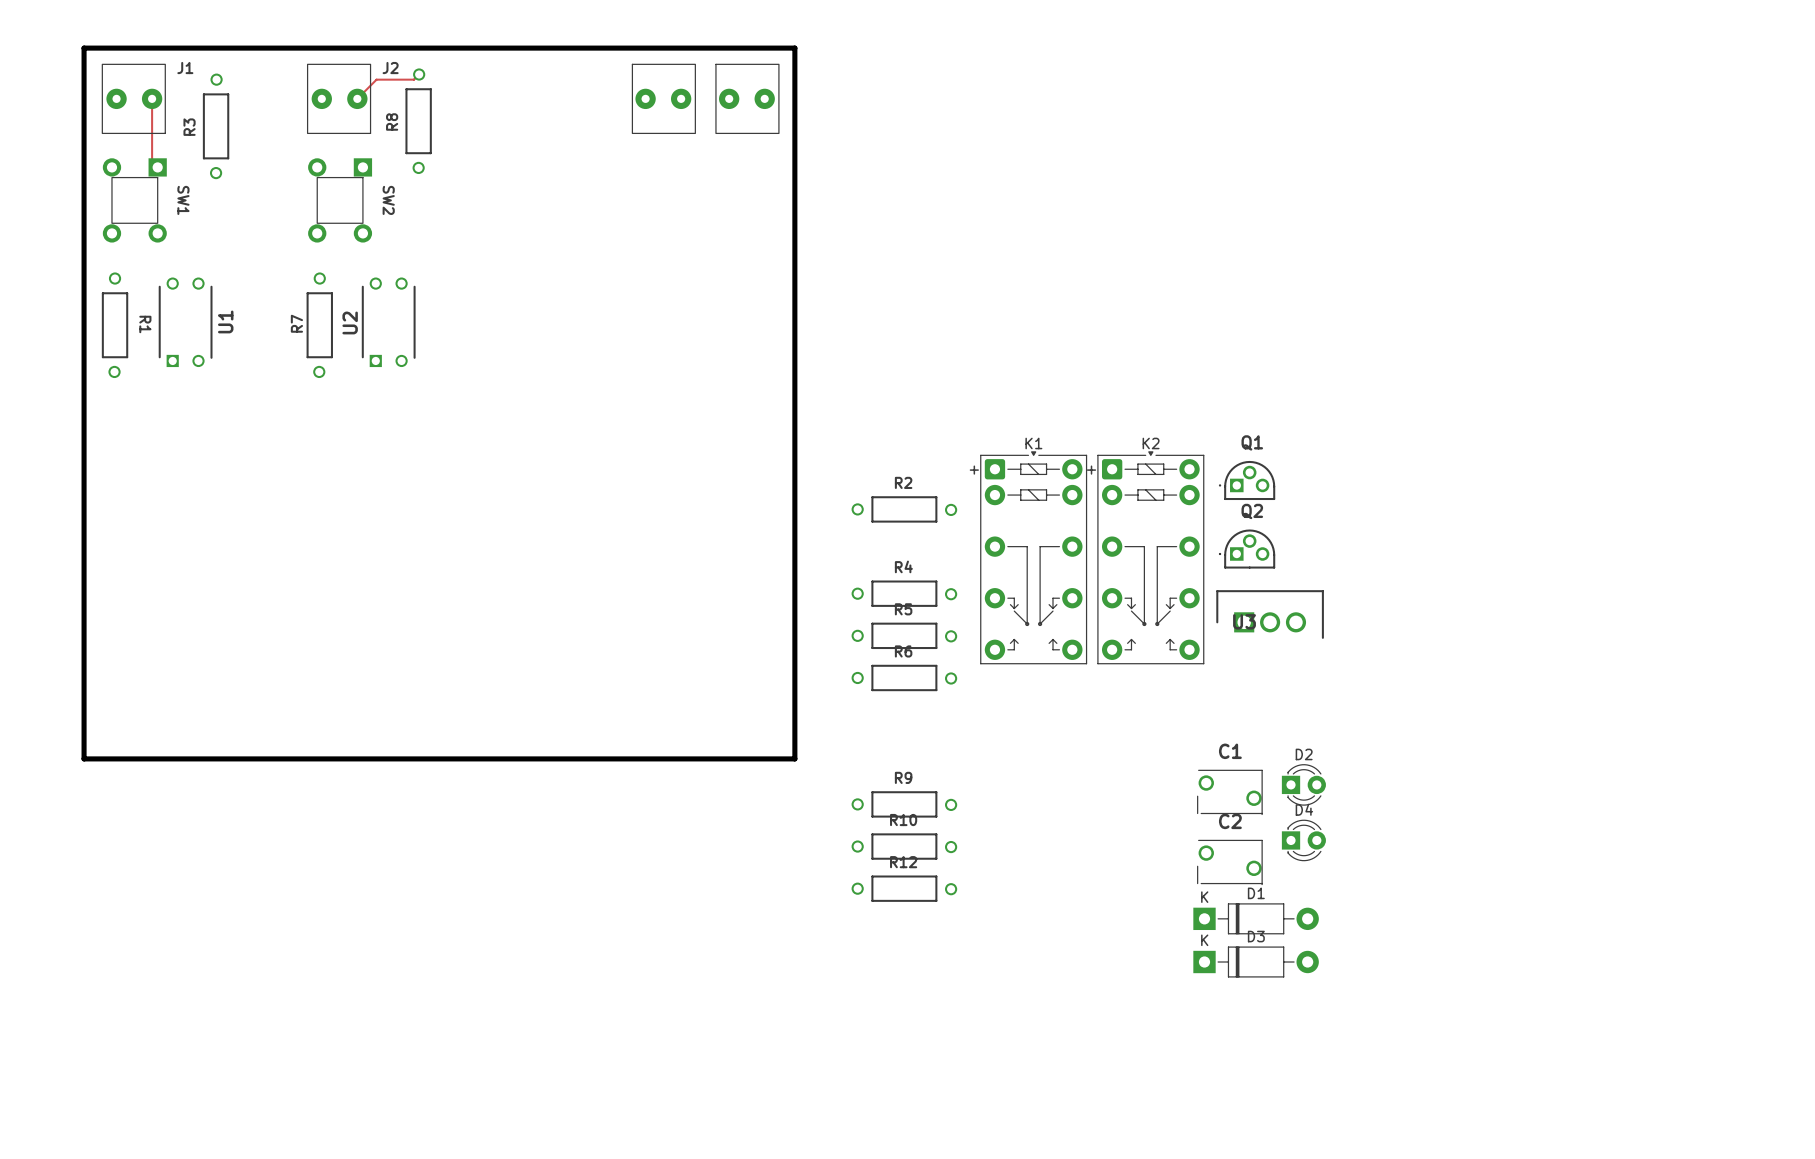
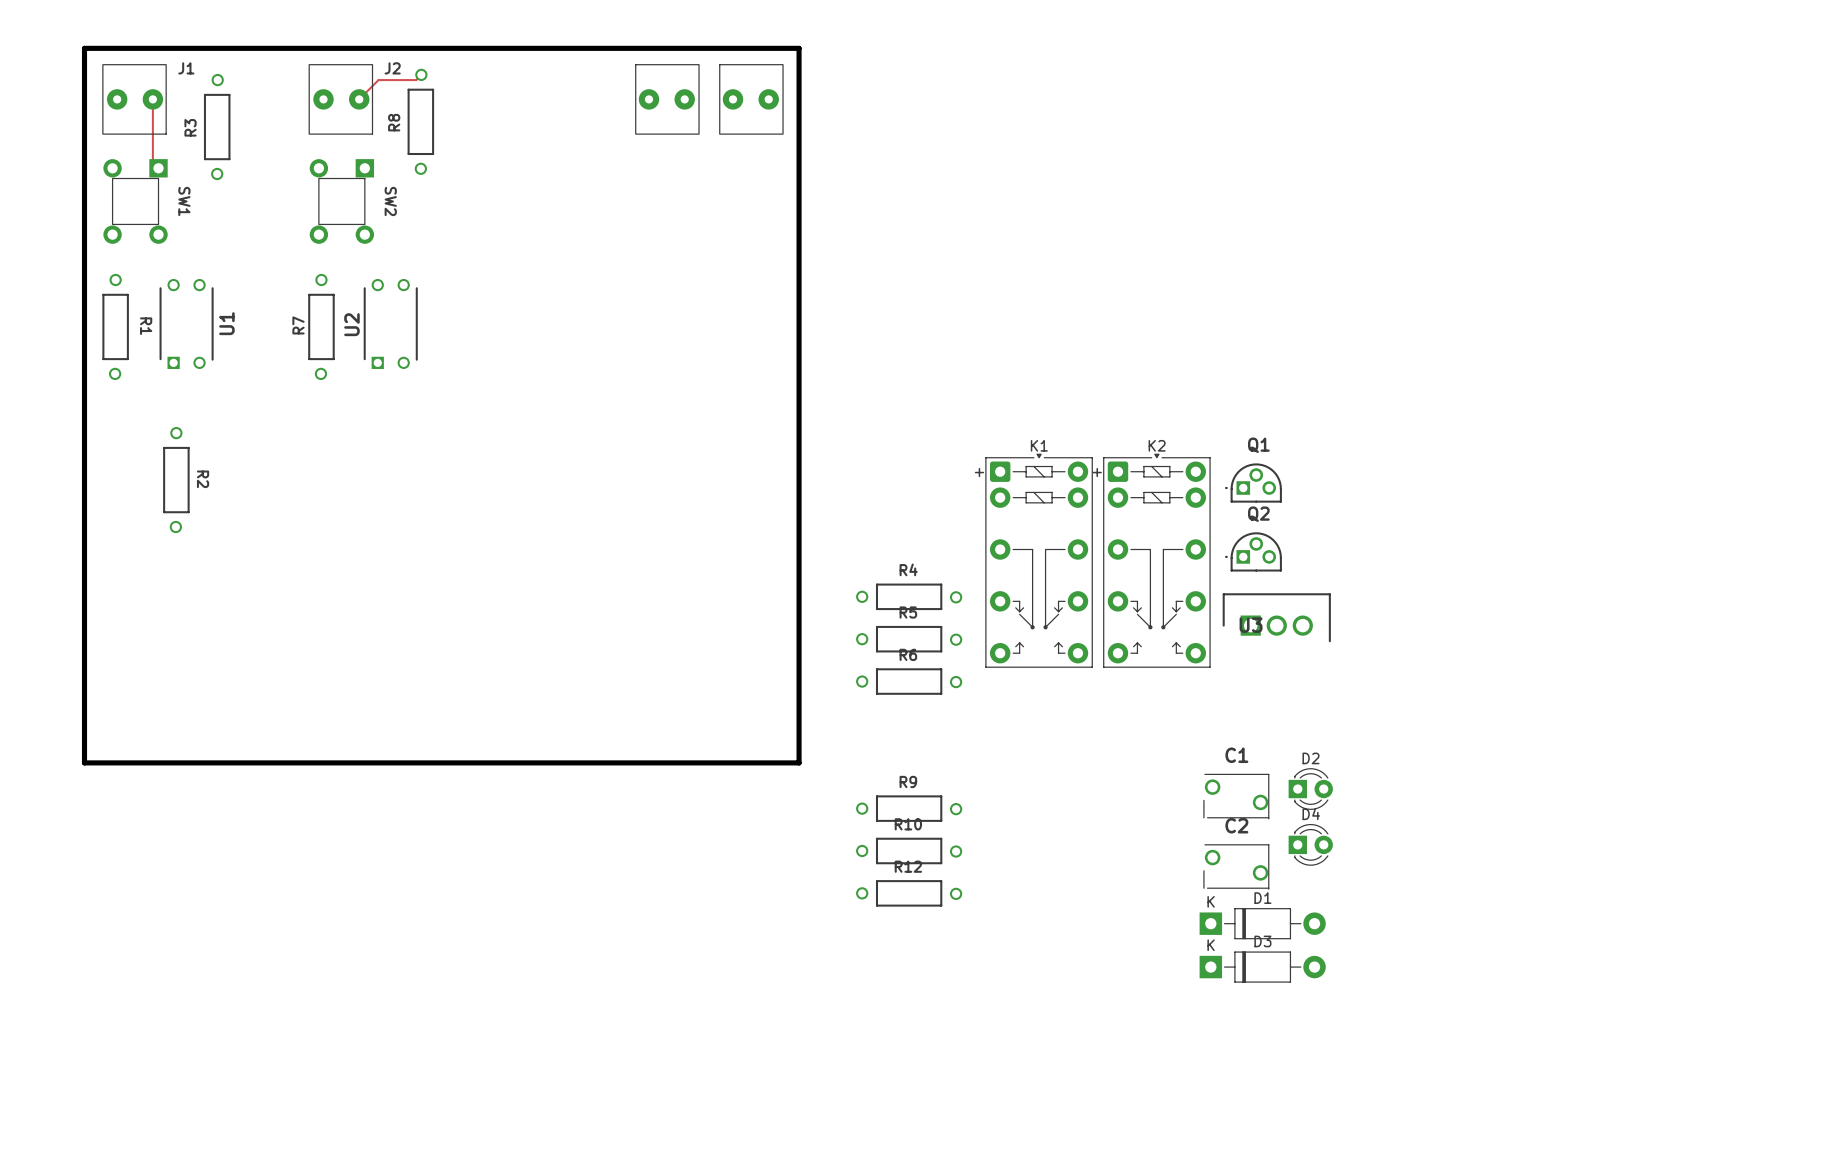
R2 rotation: 0° (904, 509) -> 90° clockwise (176, 480)
R2 position: (904, 509) -> (176, 480)

